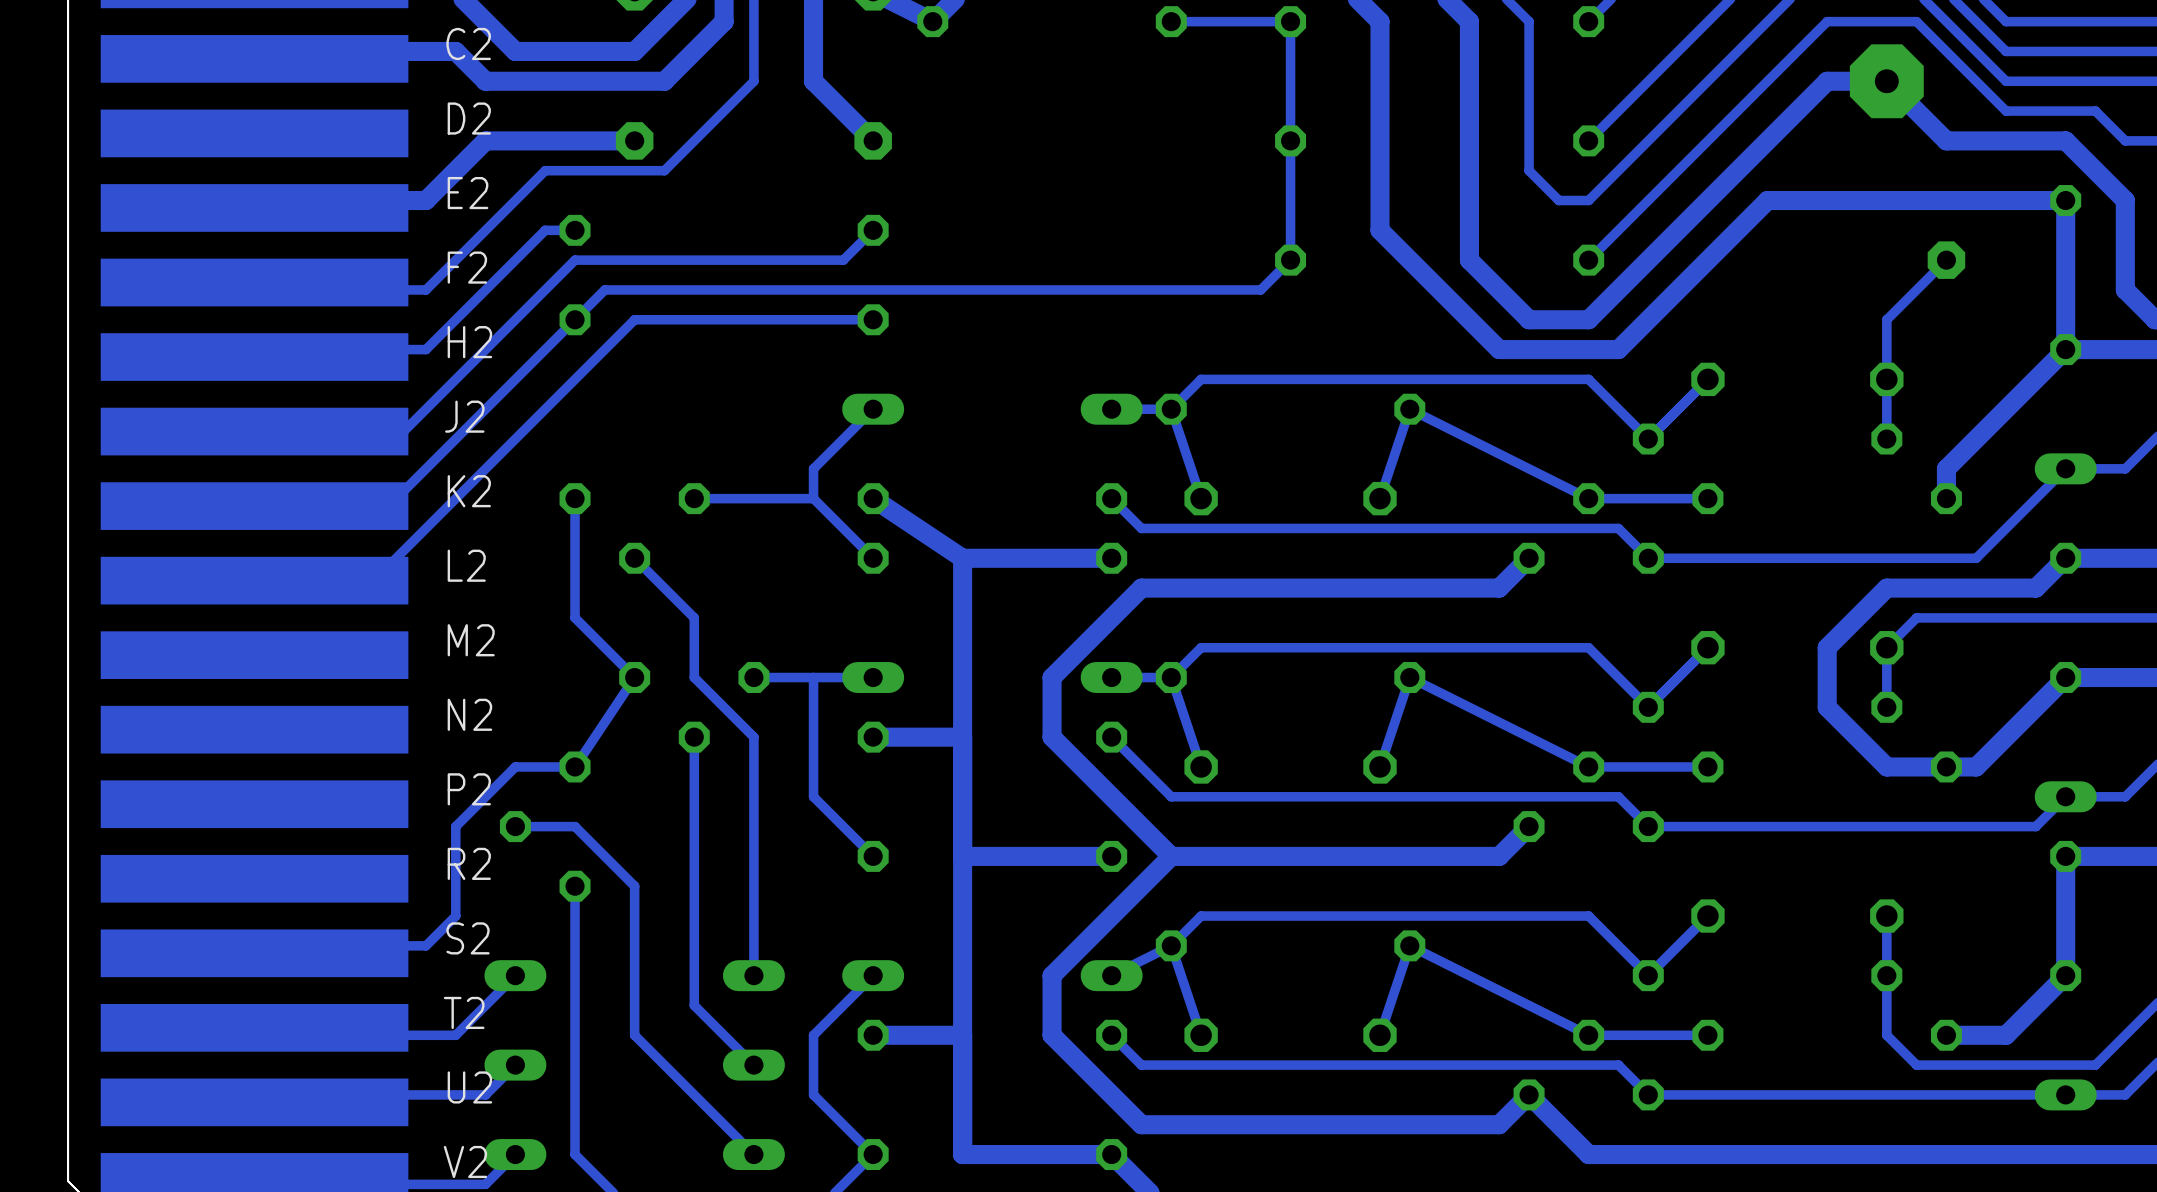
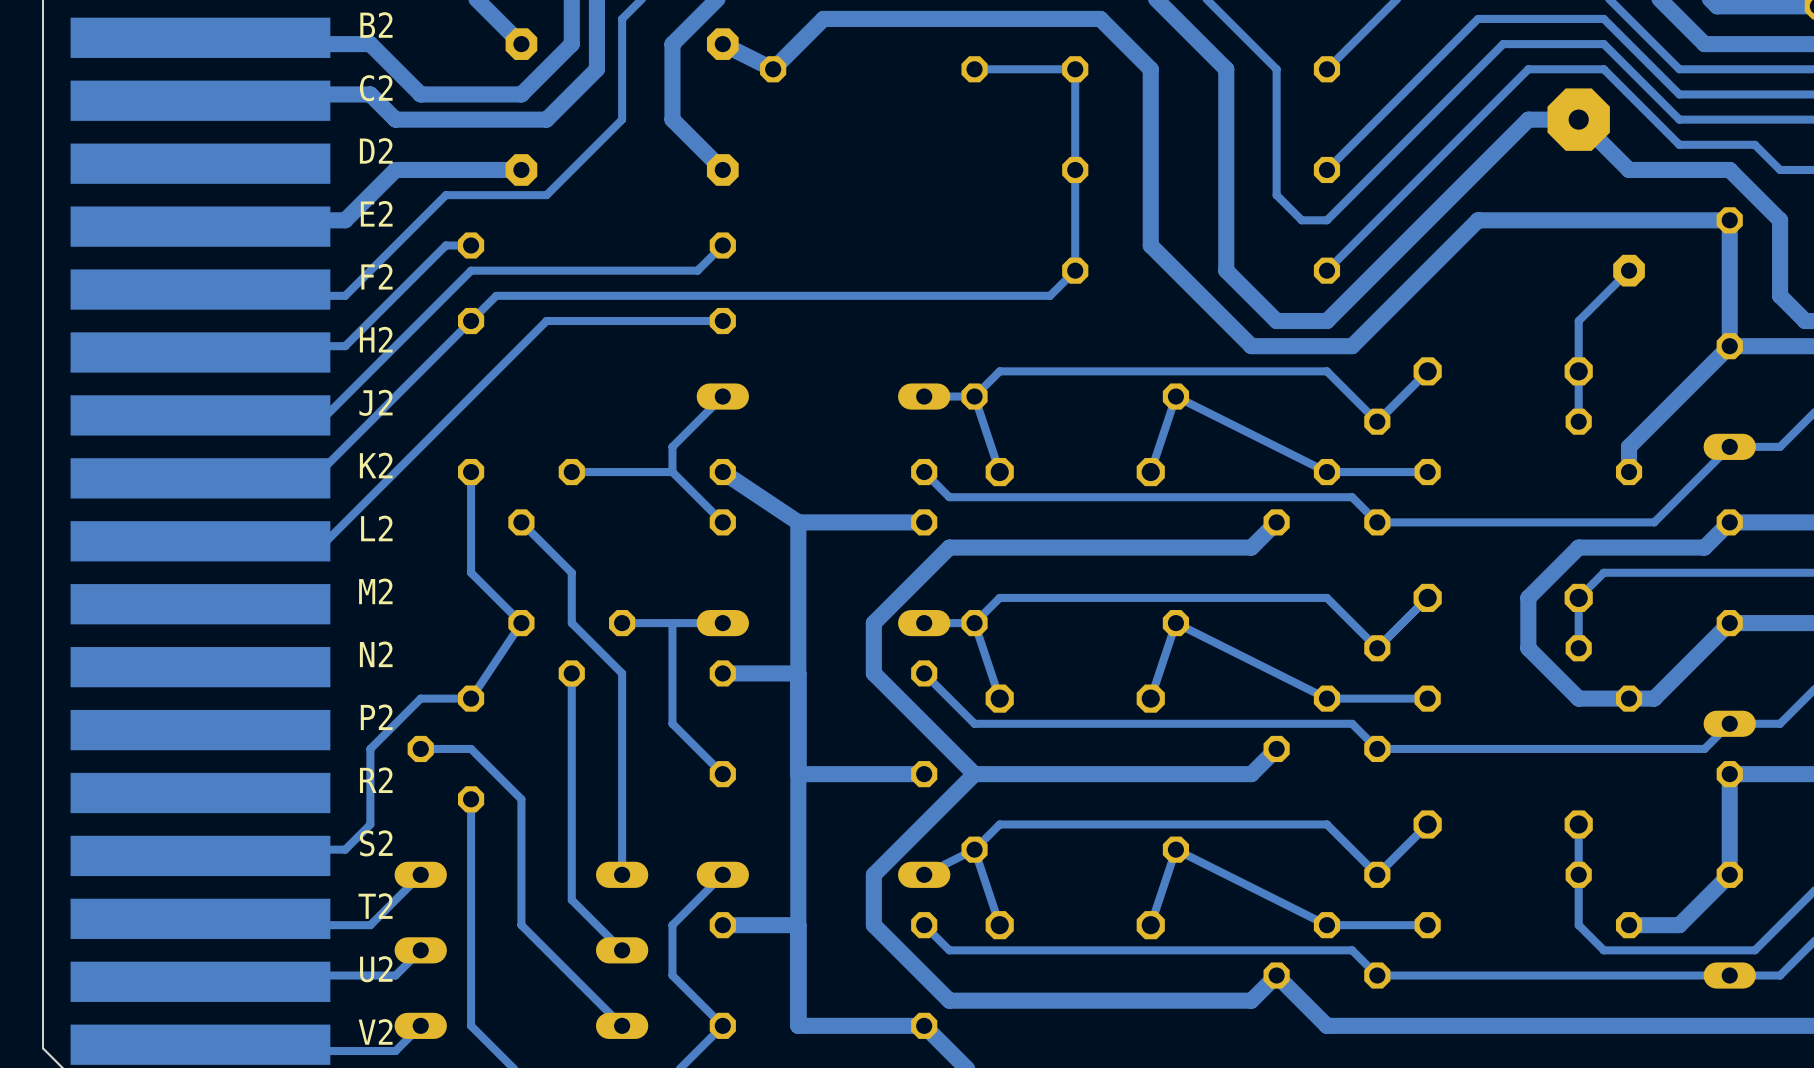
track: (664, 319) (634, 319) (366, 588) -> (546, 321) (320, 547) (294, 547)

